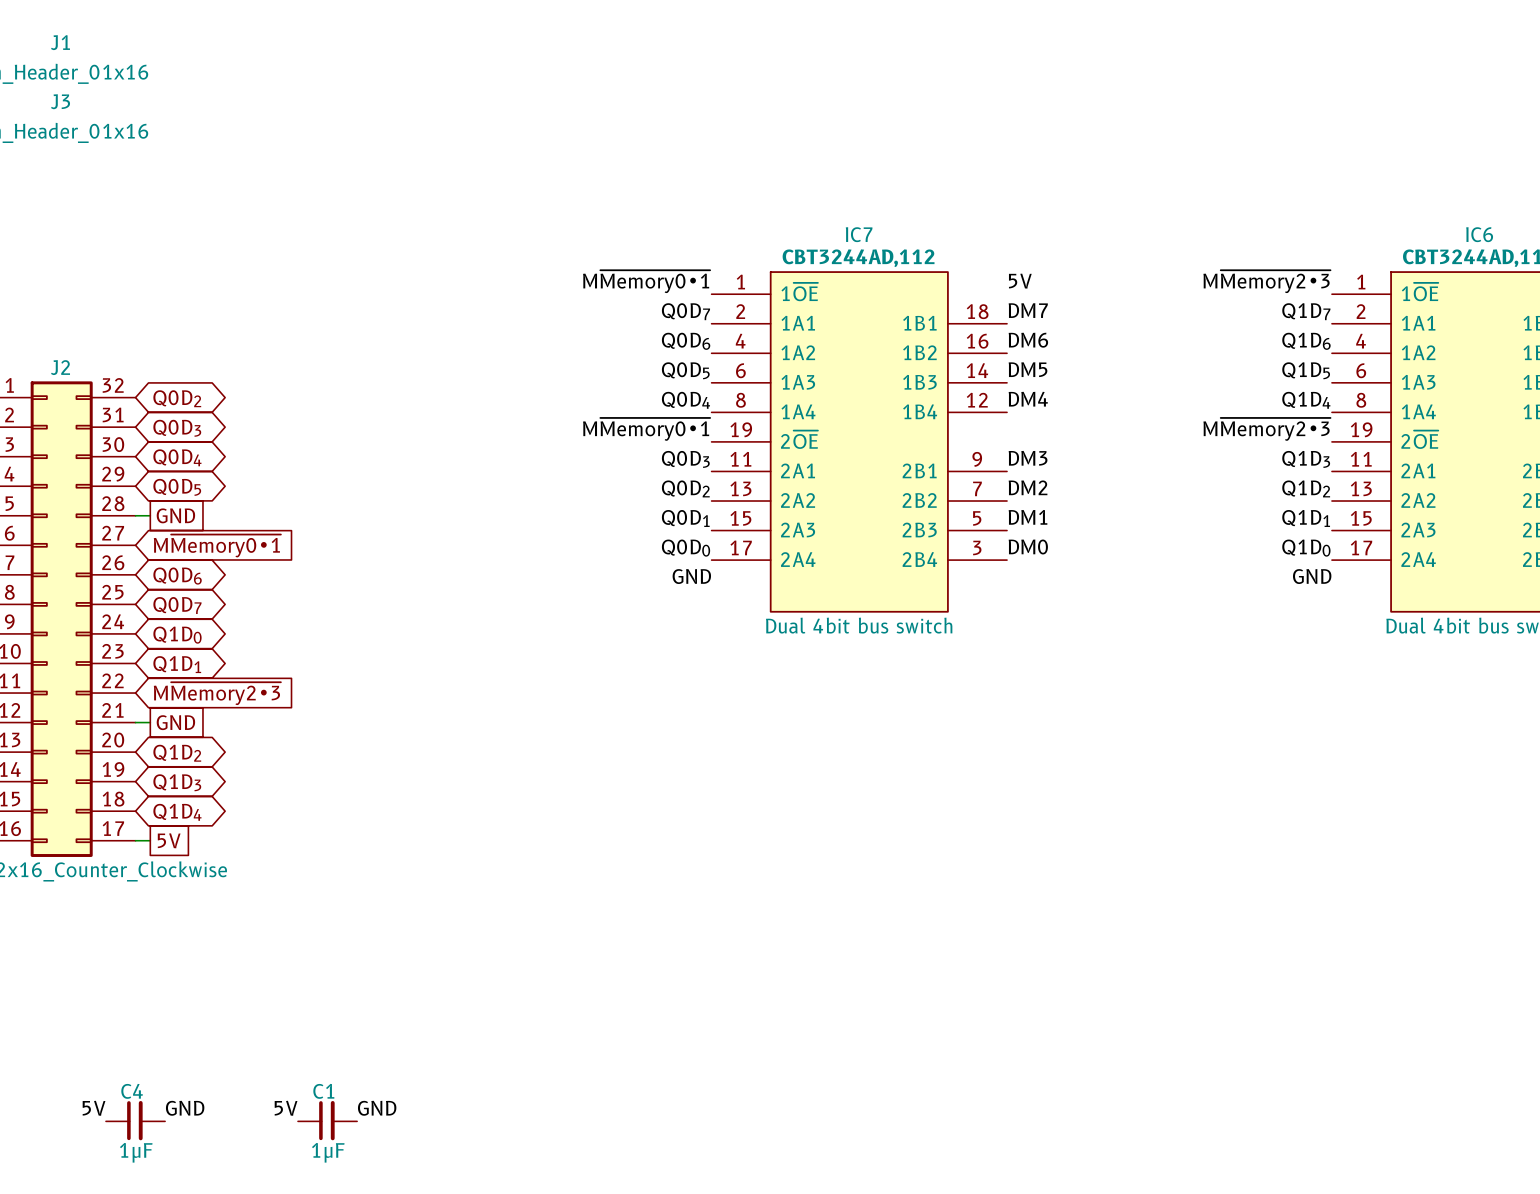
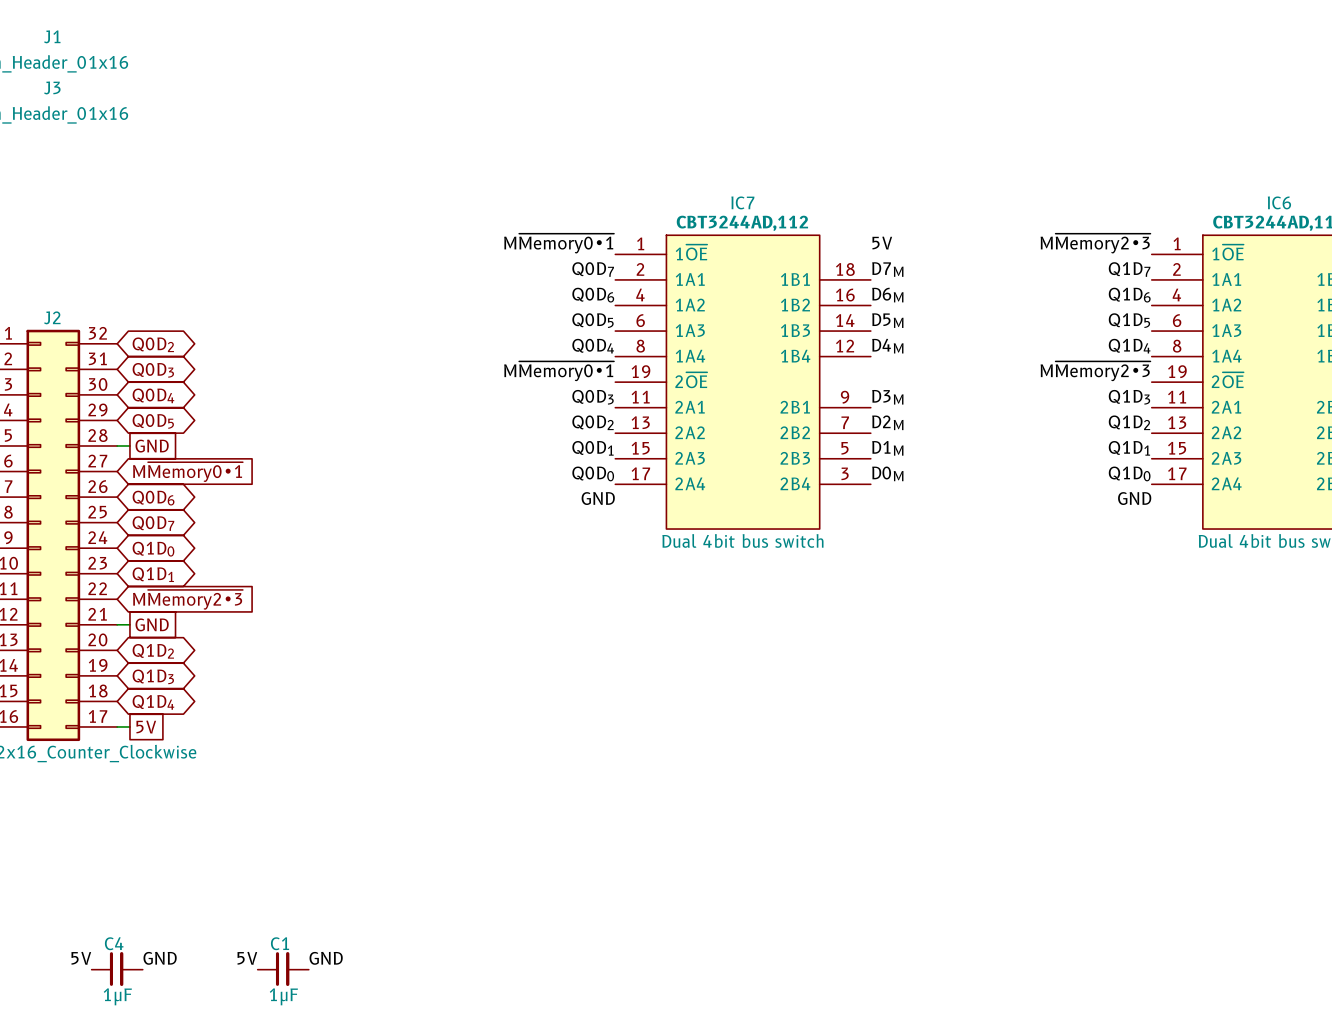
label: DM7 (1028, 310) -> D7M (887, 269)
label: DM6 (1028, 340) -> D6M (887, 295)
label: DM5 (1028, 369) -> D5M (887, 320)
label: DM4 (1028, 399) -> D4M (887, 346)
label: DM3 (1028, 458) -> D3M (887, 397)
label: DM2 (1028, 487) -> D2M (887, 422)
label: DM1 (1028, 517) -> D1M (887, 448)
label: DM0 (1028, 546) -> D0M (887, 473)

